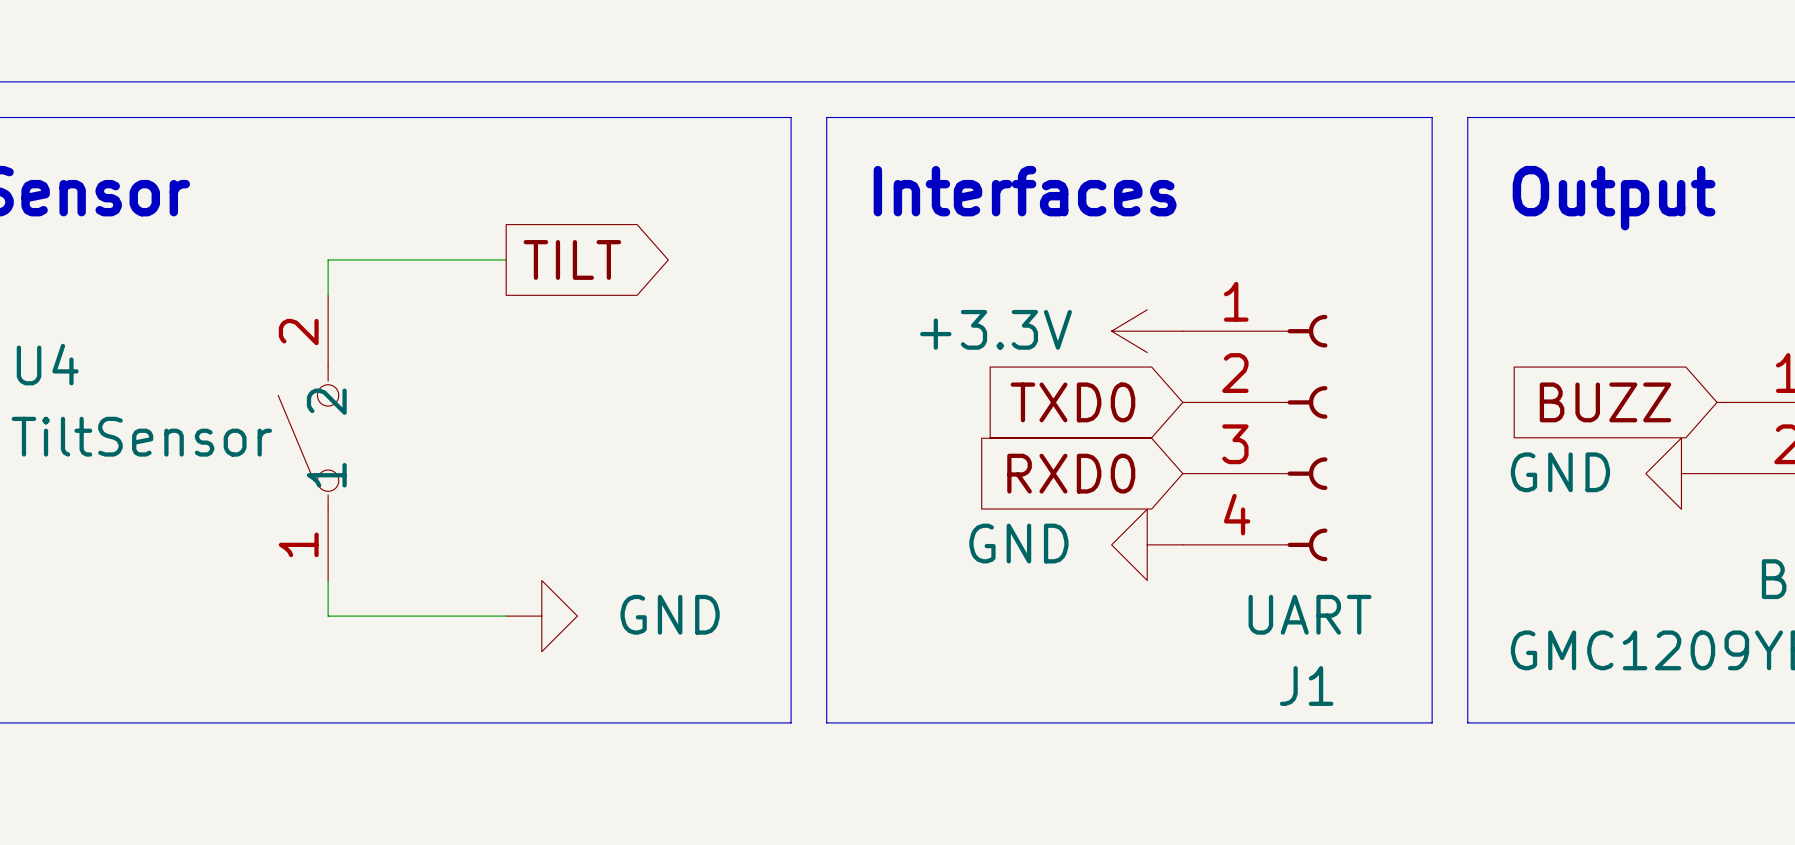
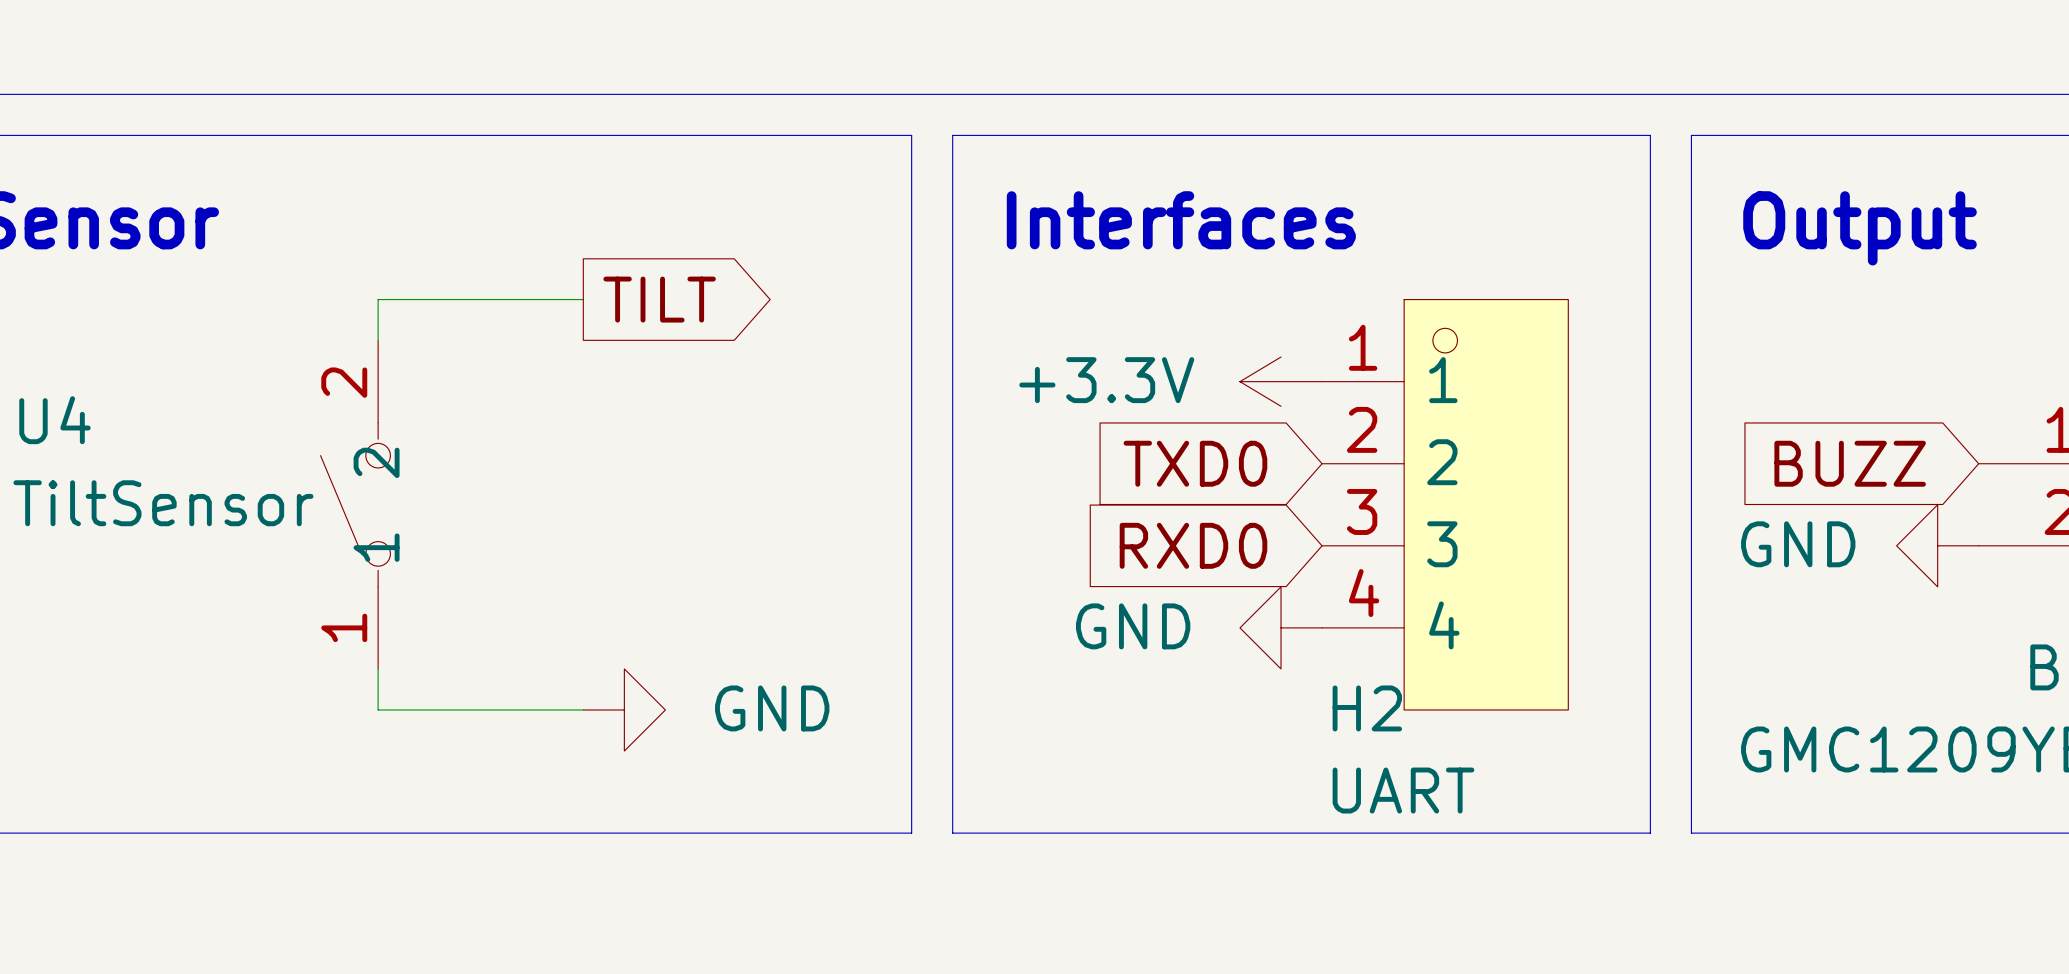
power symbol position: +3.3V (1147, 331) -> +3.3V (1281, 381)
global label position: TXD0 (1072, 402) -> TXD0 (1195, 463)
H2: none -> UART (1445, 504)
J1: UART (1255, 438) -> none
global label position: RXD0 (1071, 473) -> RXD0 (1193, 545)
power symbol position: GND (1147, 544) -> GND (1281, 627)

